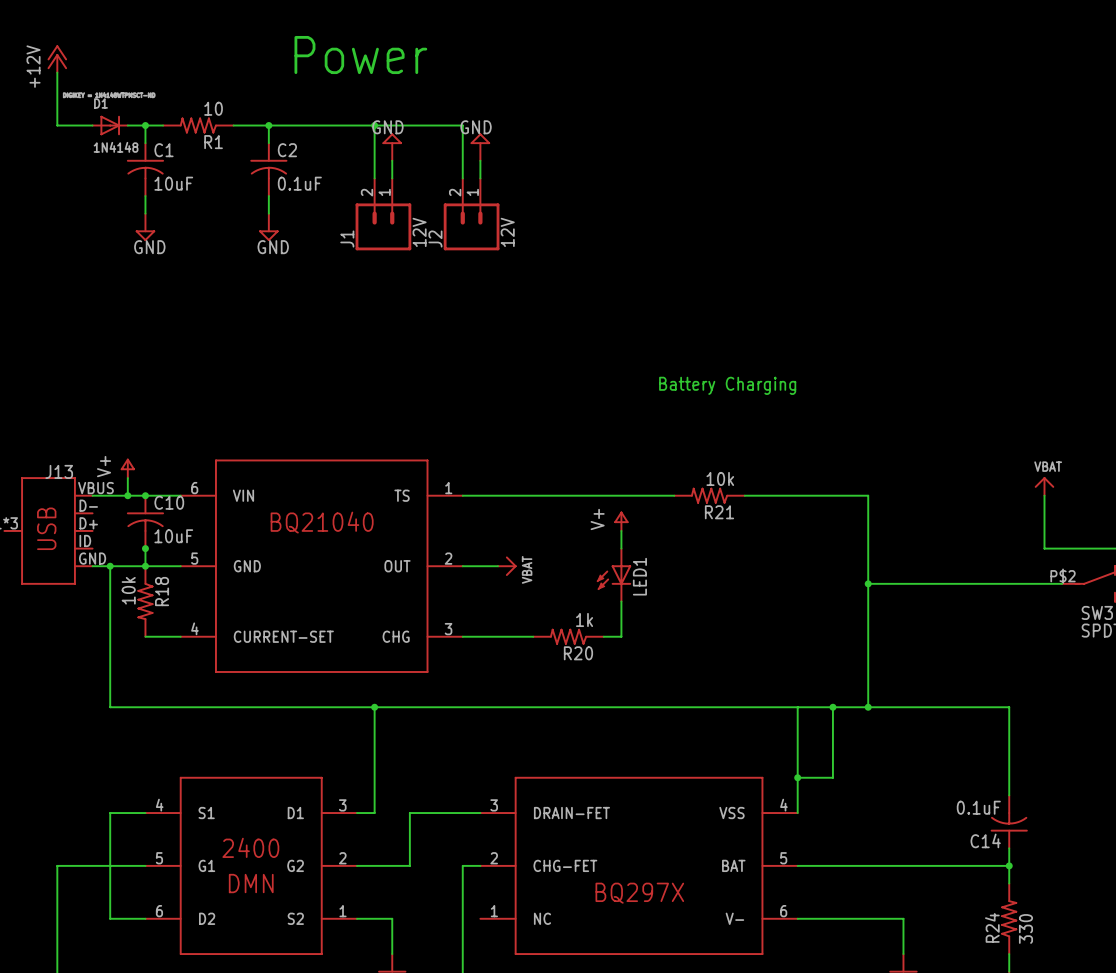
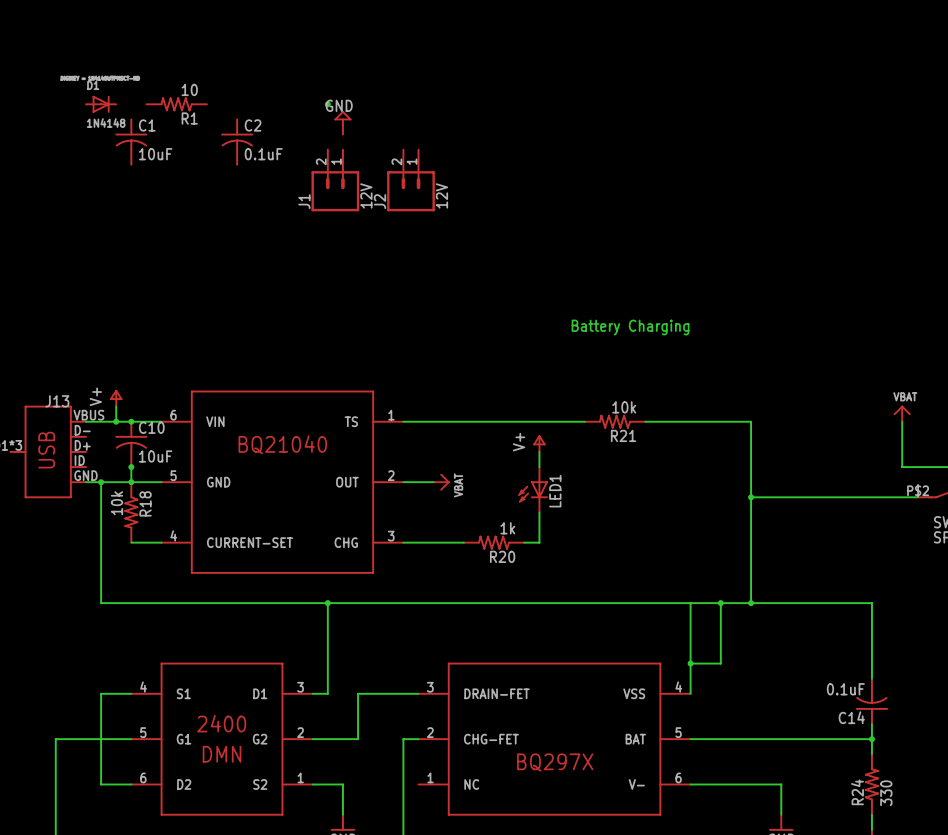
text: Power (360, 55) -> none
power symbol: +12V (57, 58) -> none
wire: (57, 72) (57, 125) (92, 125) -> none
wire: (127, 125) (163, 125) -> none
wire: (145, 125) (145, 143) -> none
junction: (145, 125) -> none
wire: (233, 125) (462, 125) (462, 178) -> none
wire: (268, 125) (268, 143) -> none
junction: (268, 125) -> none
wire: (374, 125) (374, 178) -> none
power symbol: GND (480, 147) -> none
wire: (392, 160) (392, 178) -> none
wire: (480, 160) (480, 178) -> none
wire: (145, 196) (145, 213) -> none
wire: (268, 196) (268, 213) -> none
power symbol: GND (145, 227) -> none
power symbol: GND (268, 227) -> none

